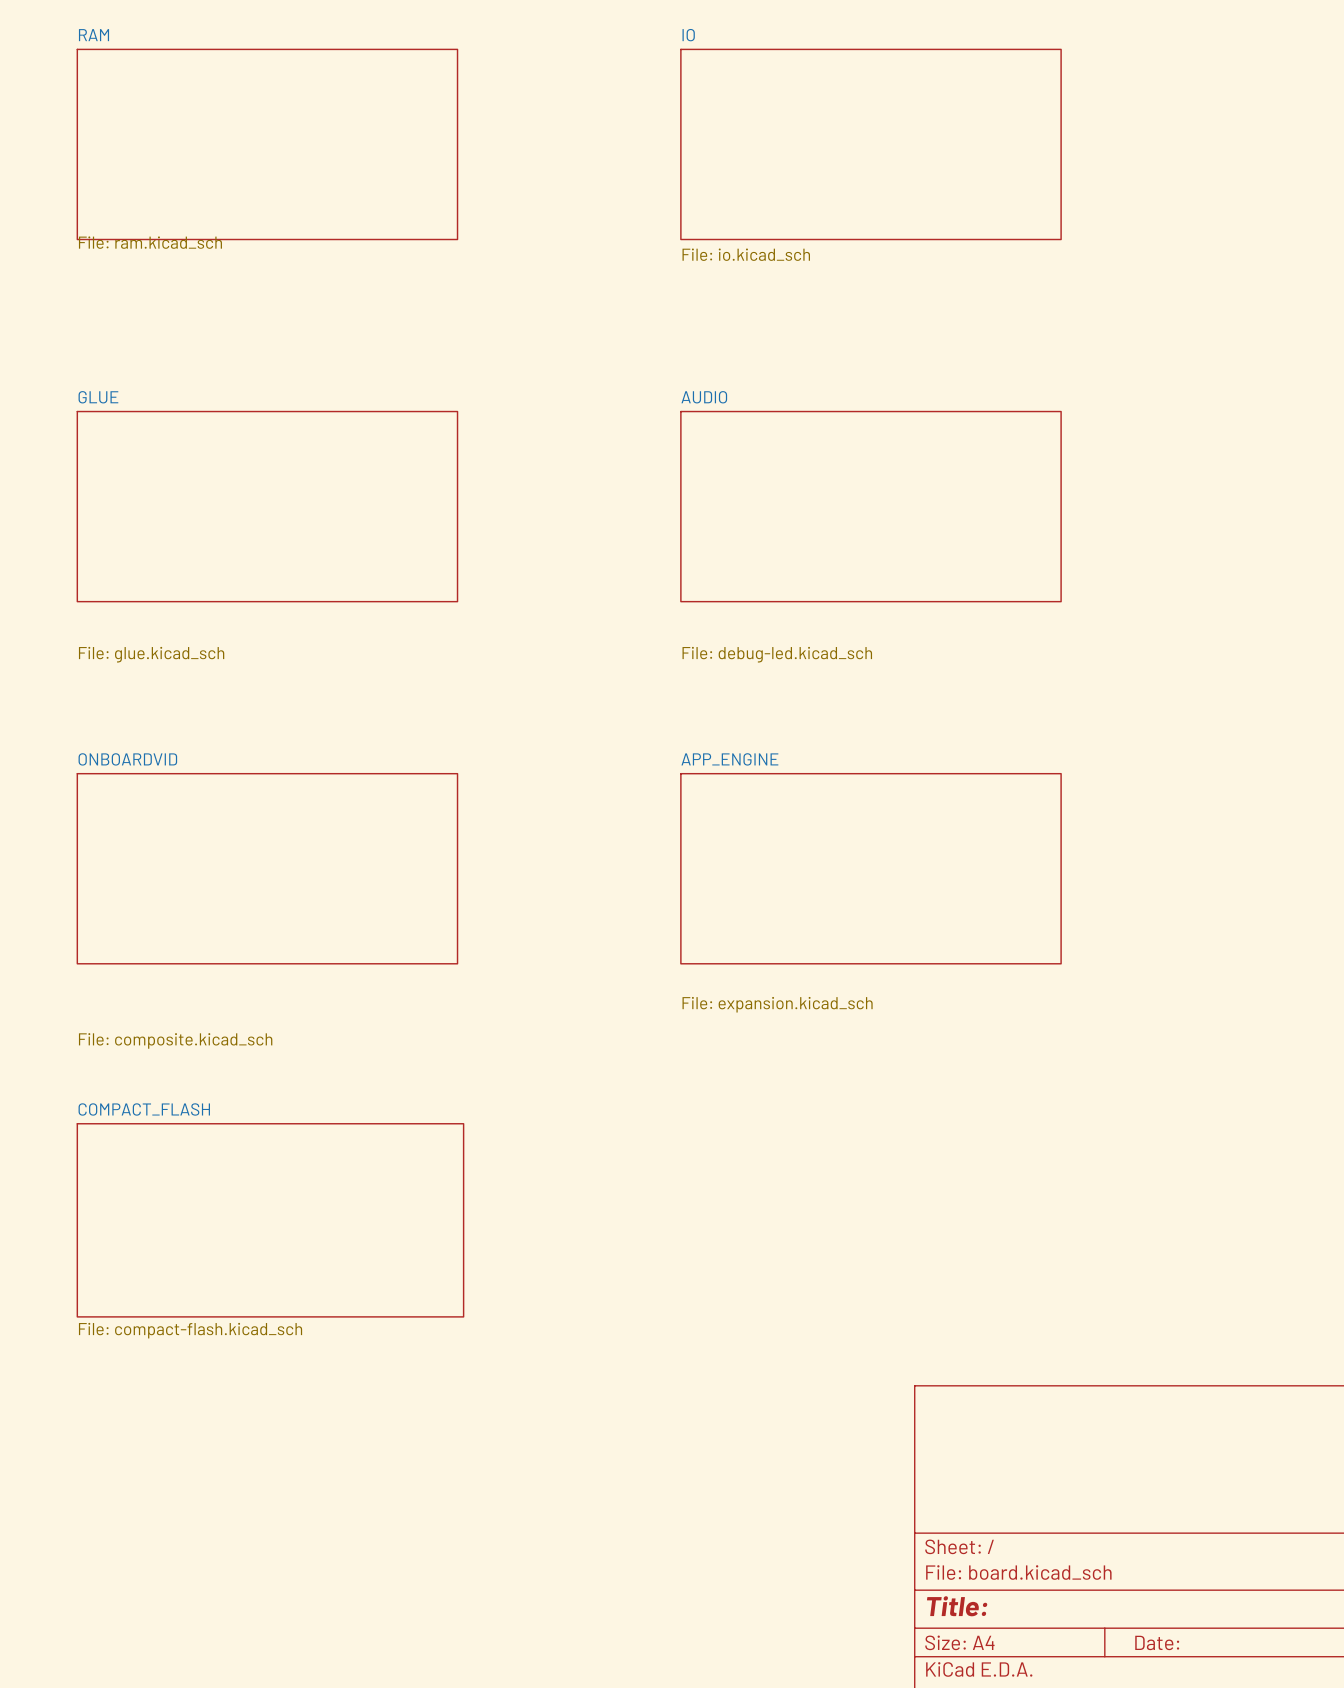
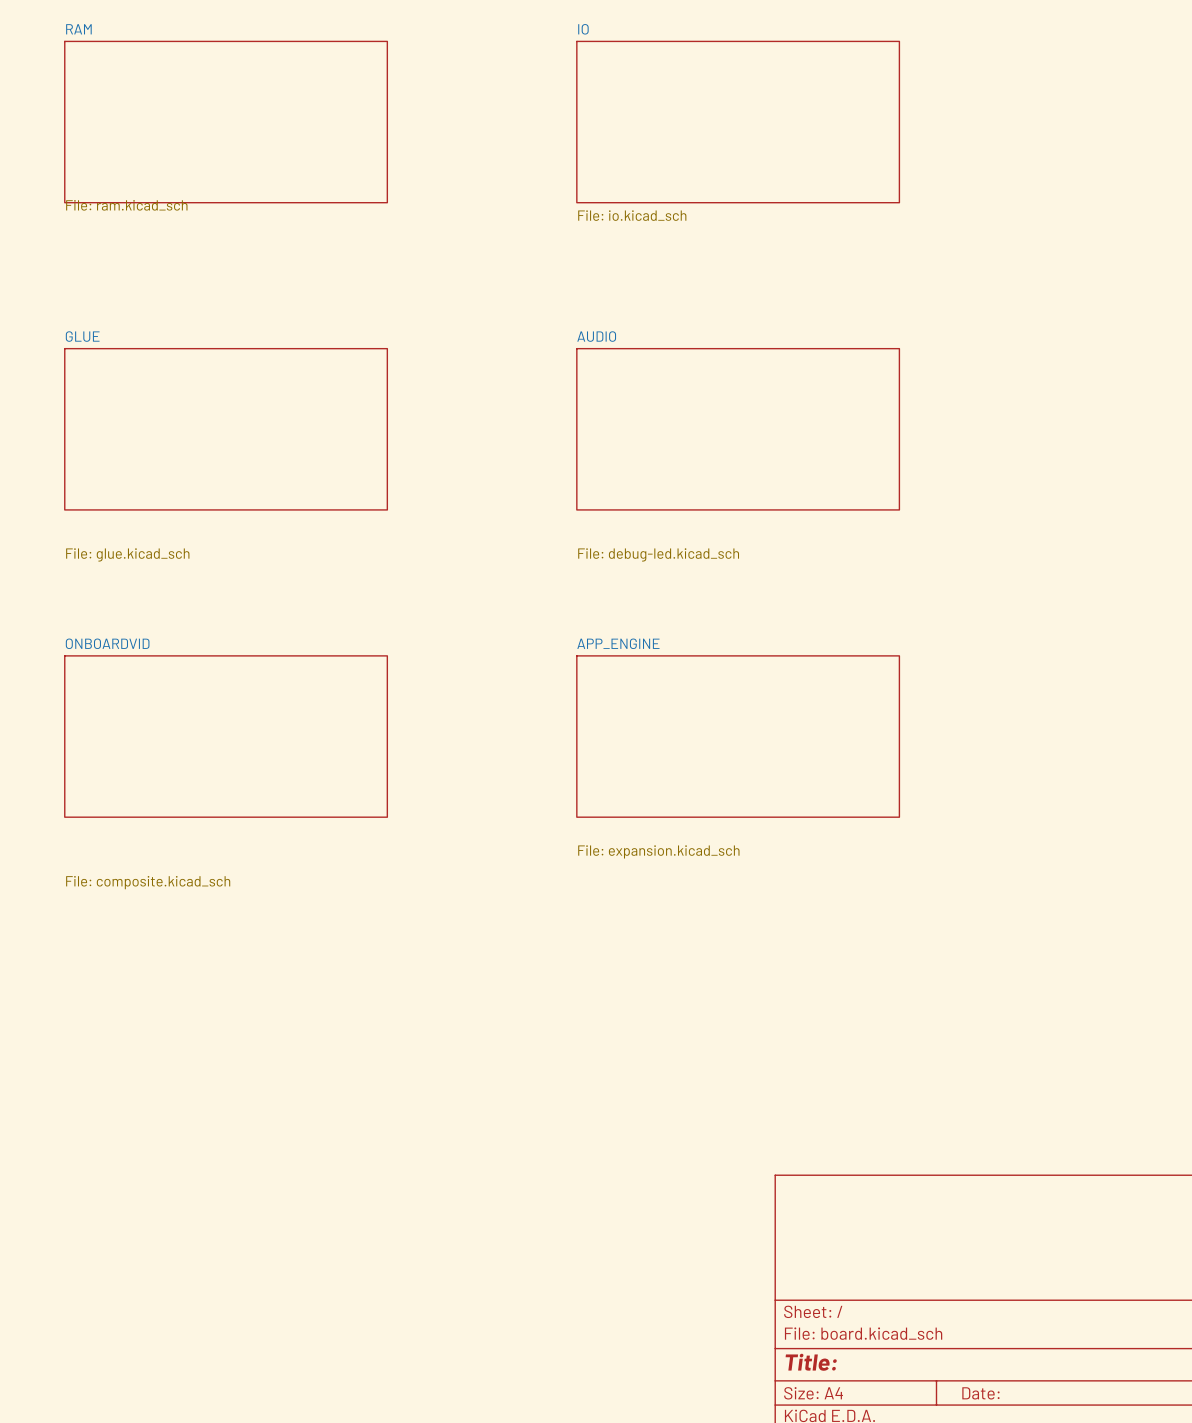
sheet COMPACT_FLASH: File: compact-flash.kicad_sch (270, 1220) -> none

